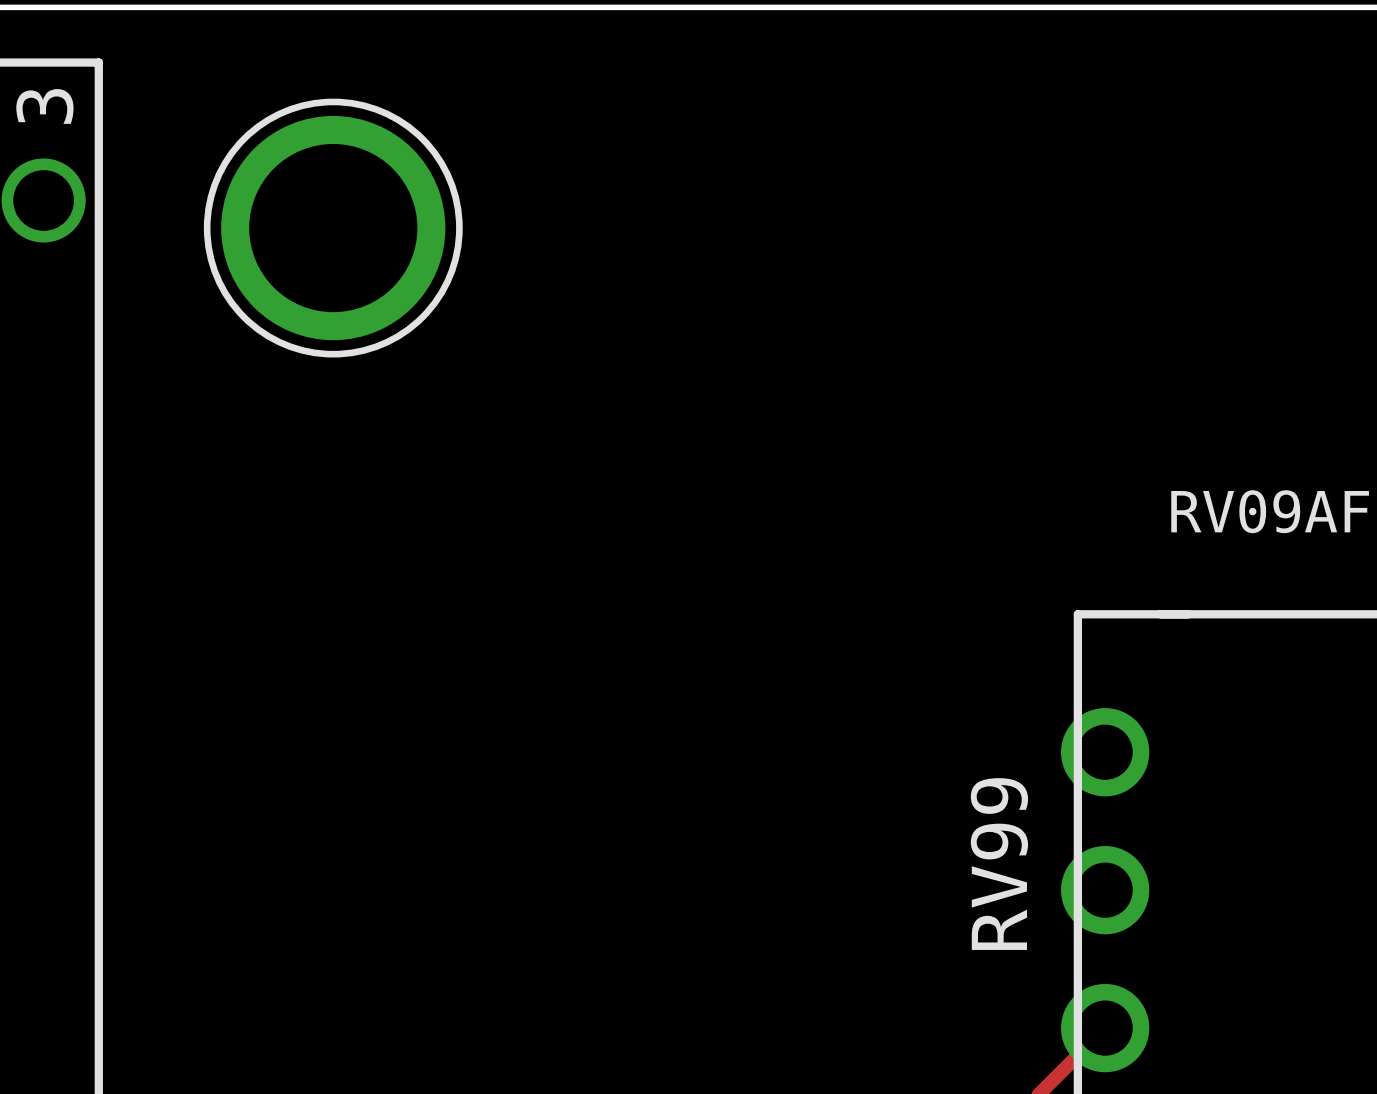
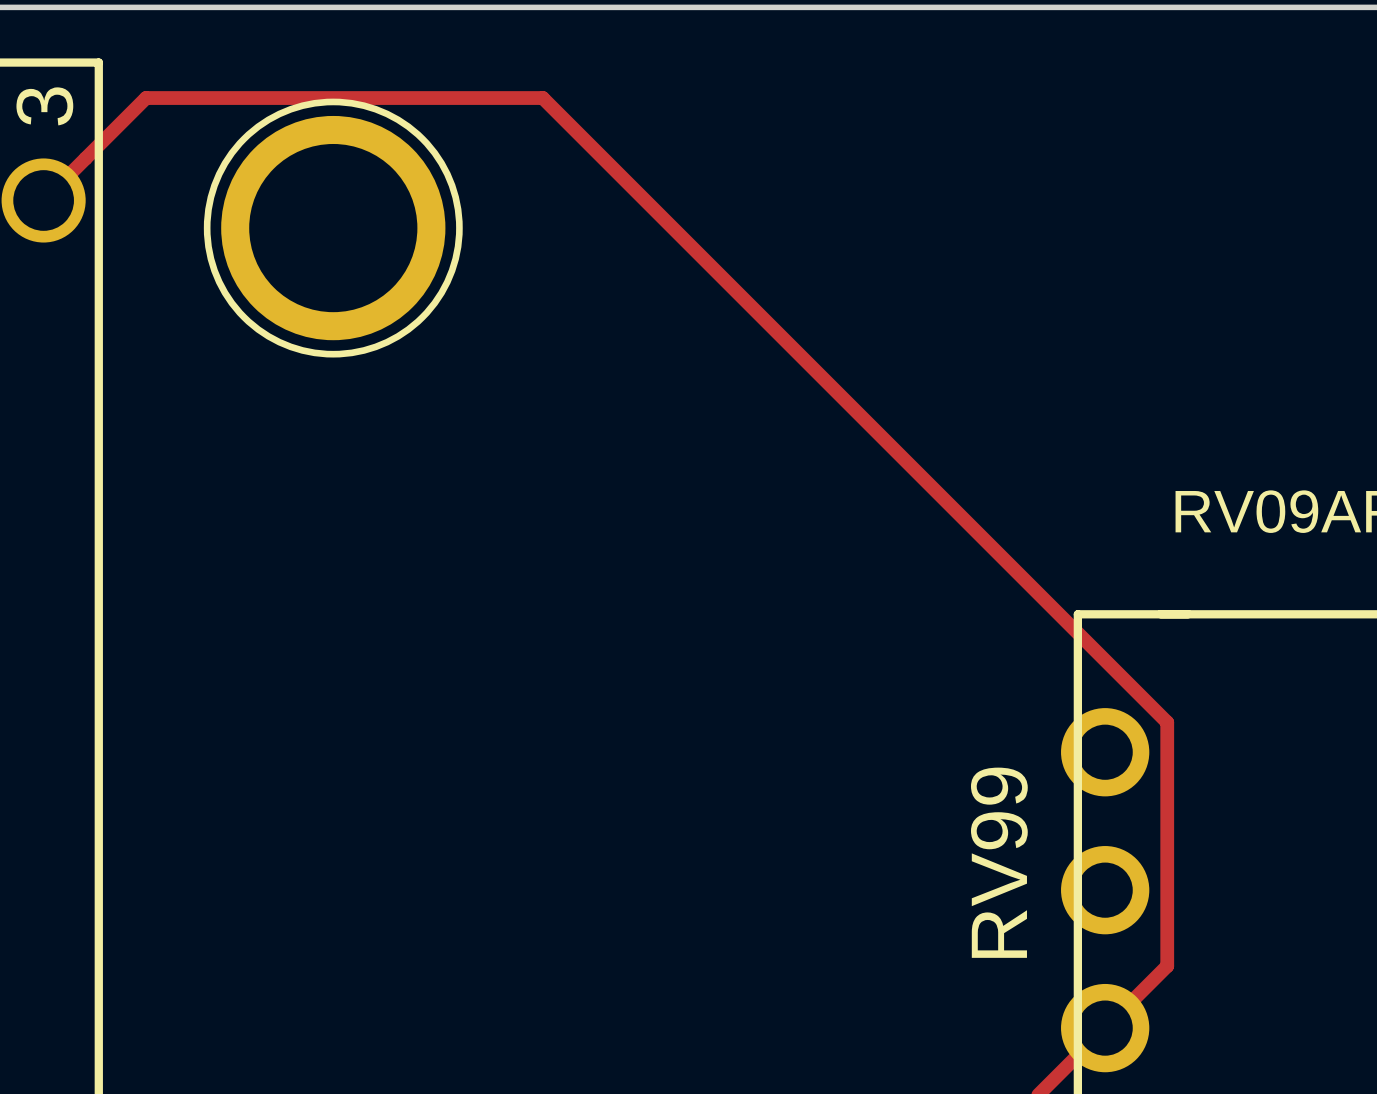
track: none -> (43, 200) (146, 98) (542, 98) (1167, 722) (1167, 966) (1105, 1028)

